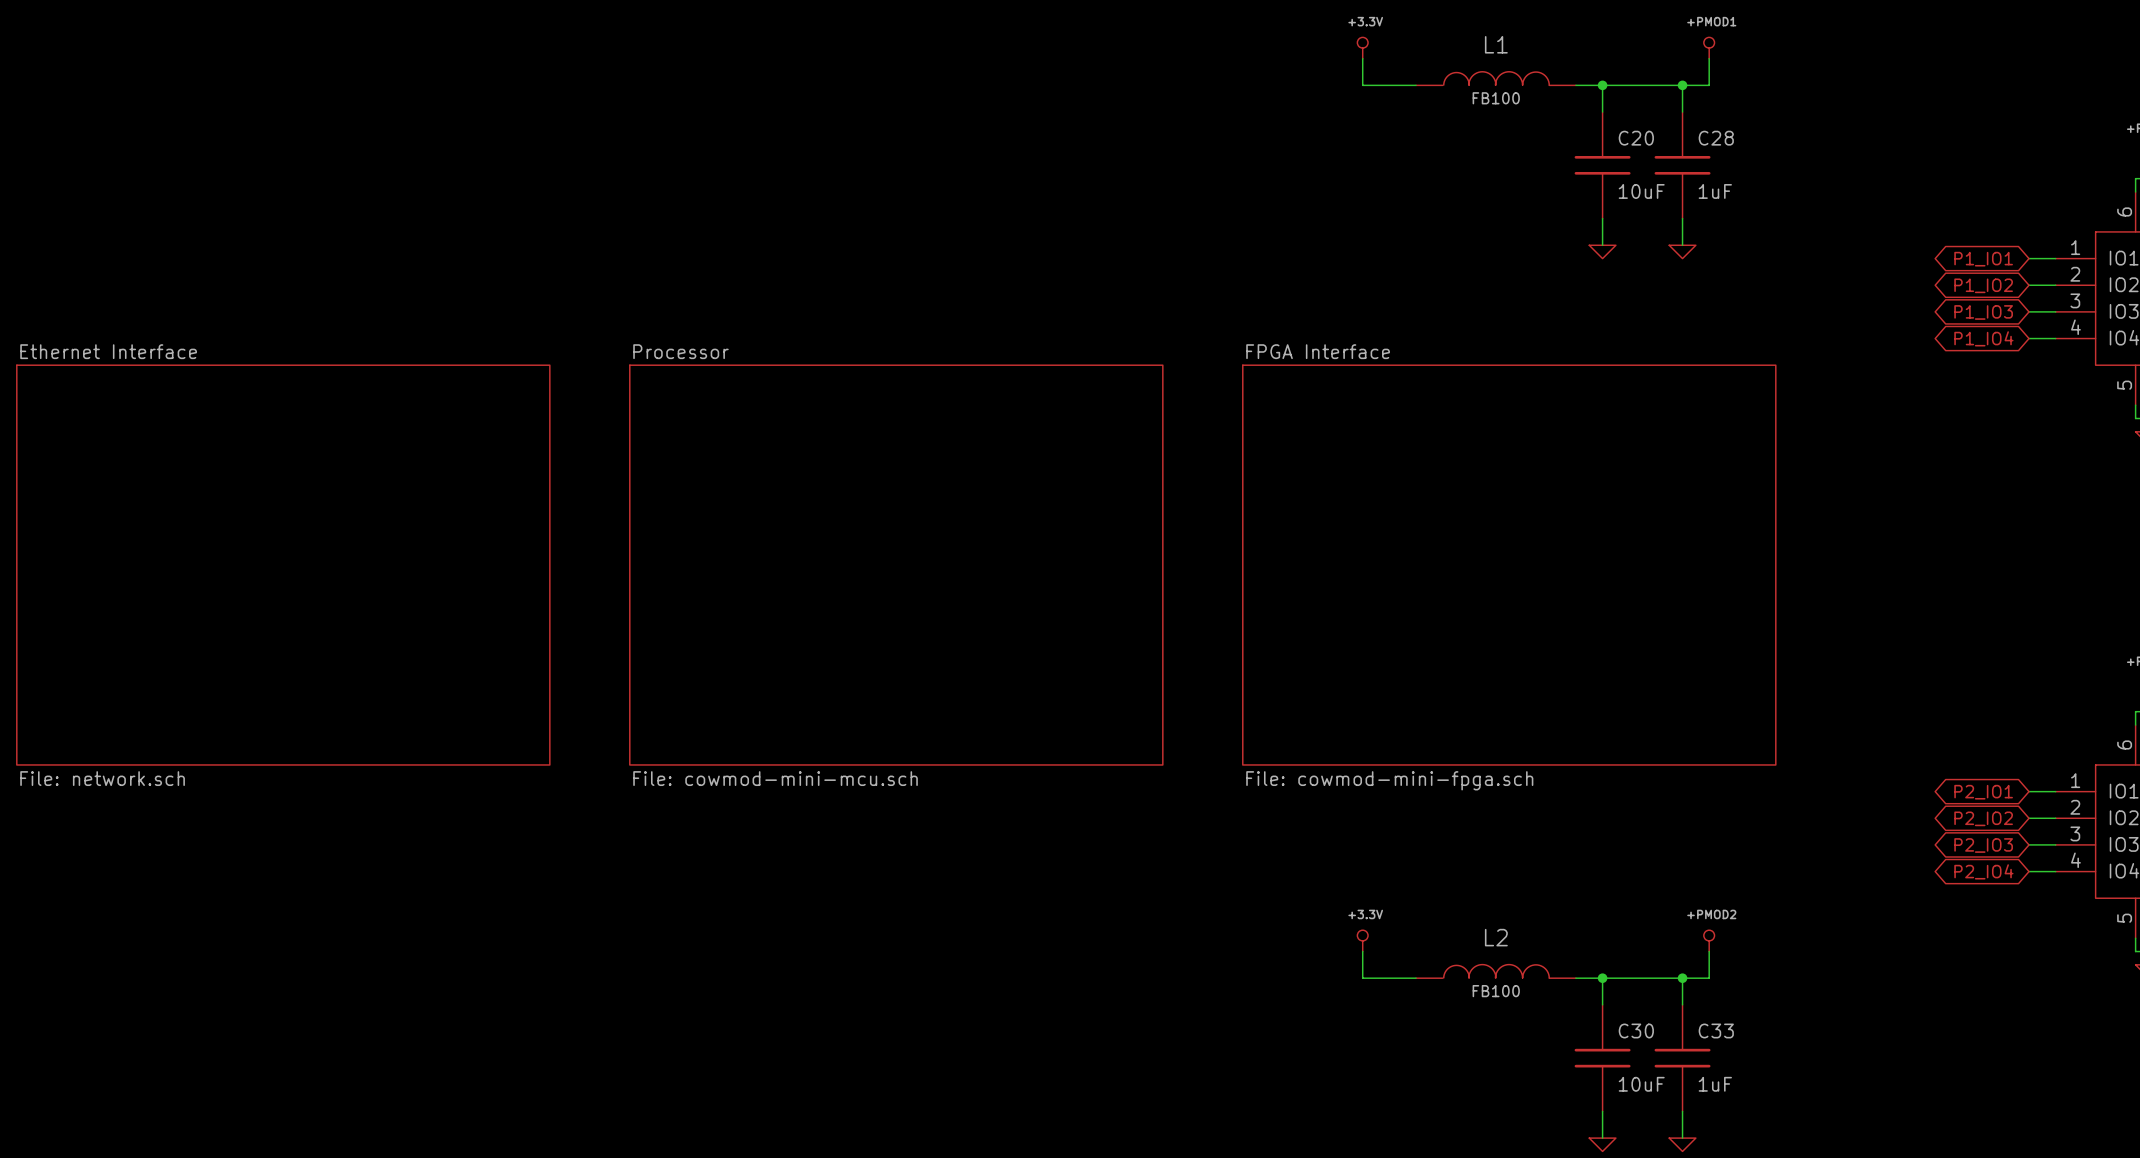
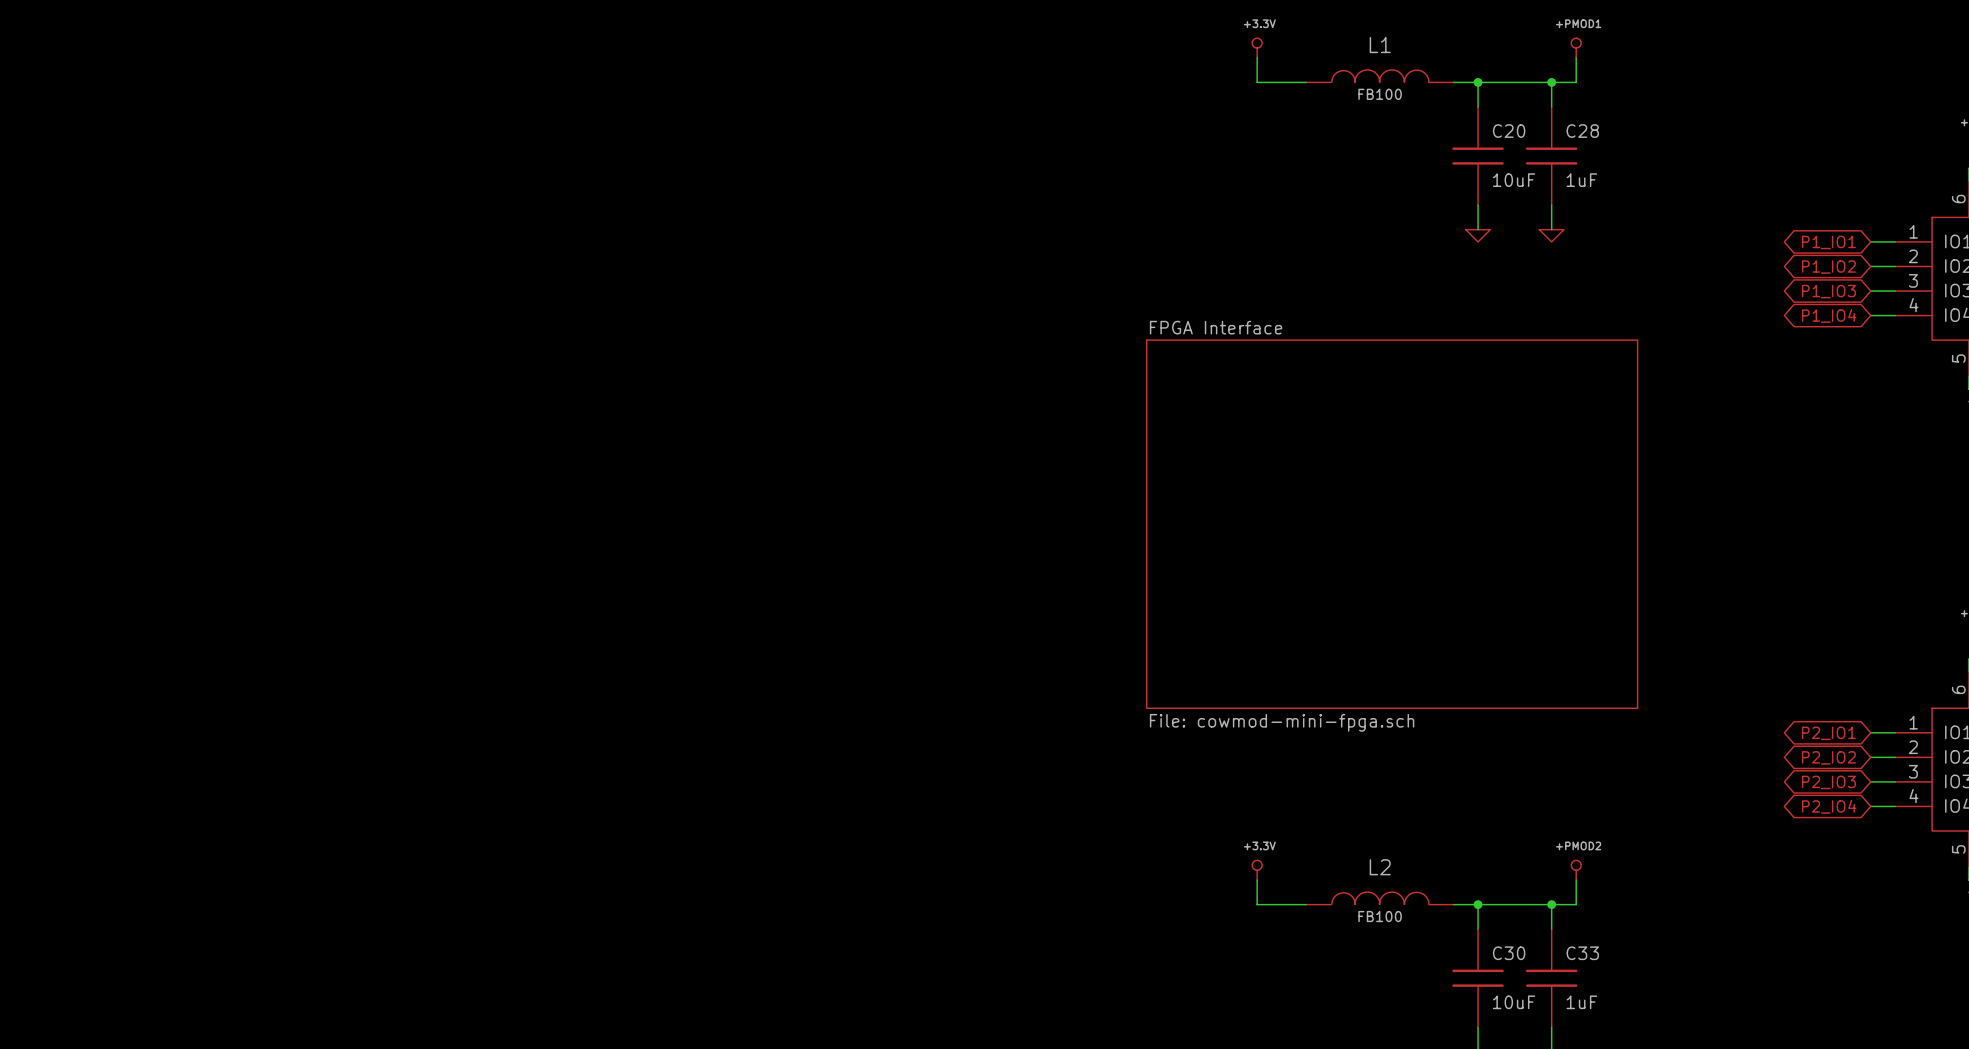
sheet Ethernet Interface: File: network.sch (283, 565) -> none
sheet Processor: File: cowmod-mini-mcu.sch (896, 565) -> none

